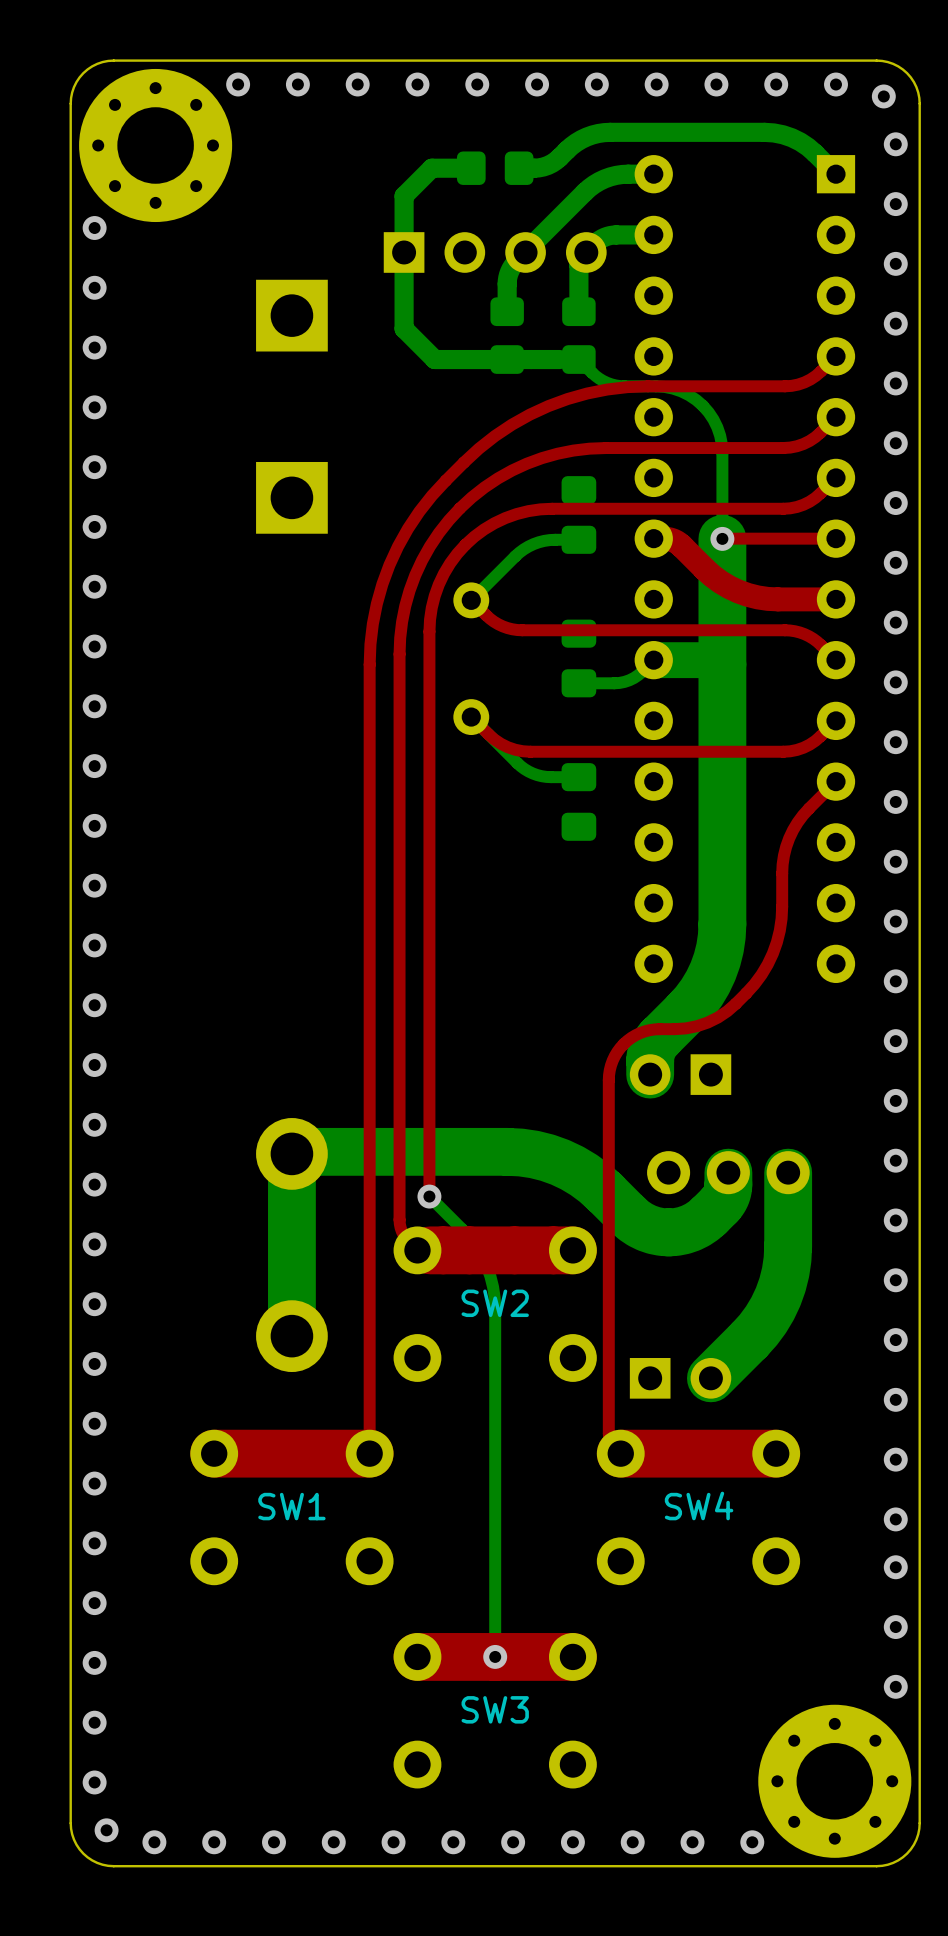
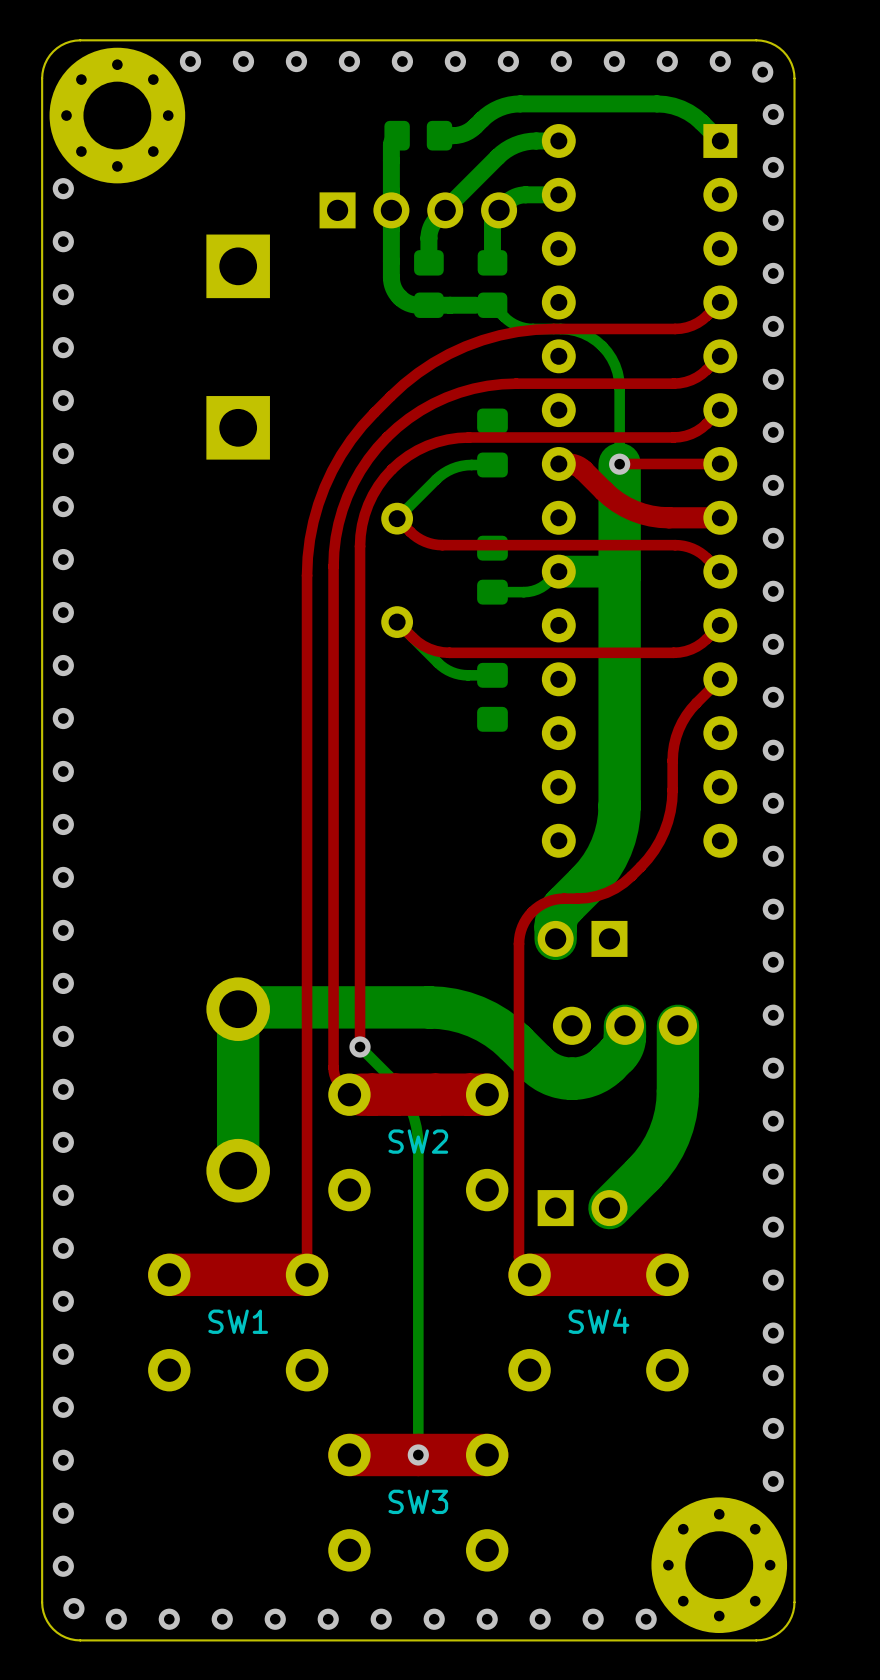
bottom track: (471, 168) (431, 168) (404, 196) (404, 328) (434, 359) (495, 359) -> (397, 135) (391, 145) (391, 280) (394, 290) (400, 297) (408, 303) (418, 305)

